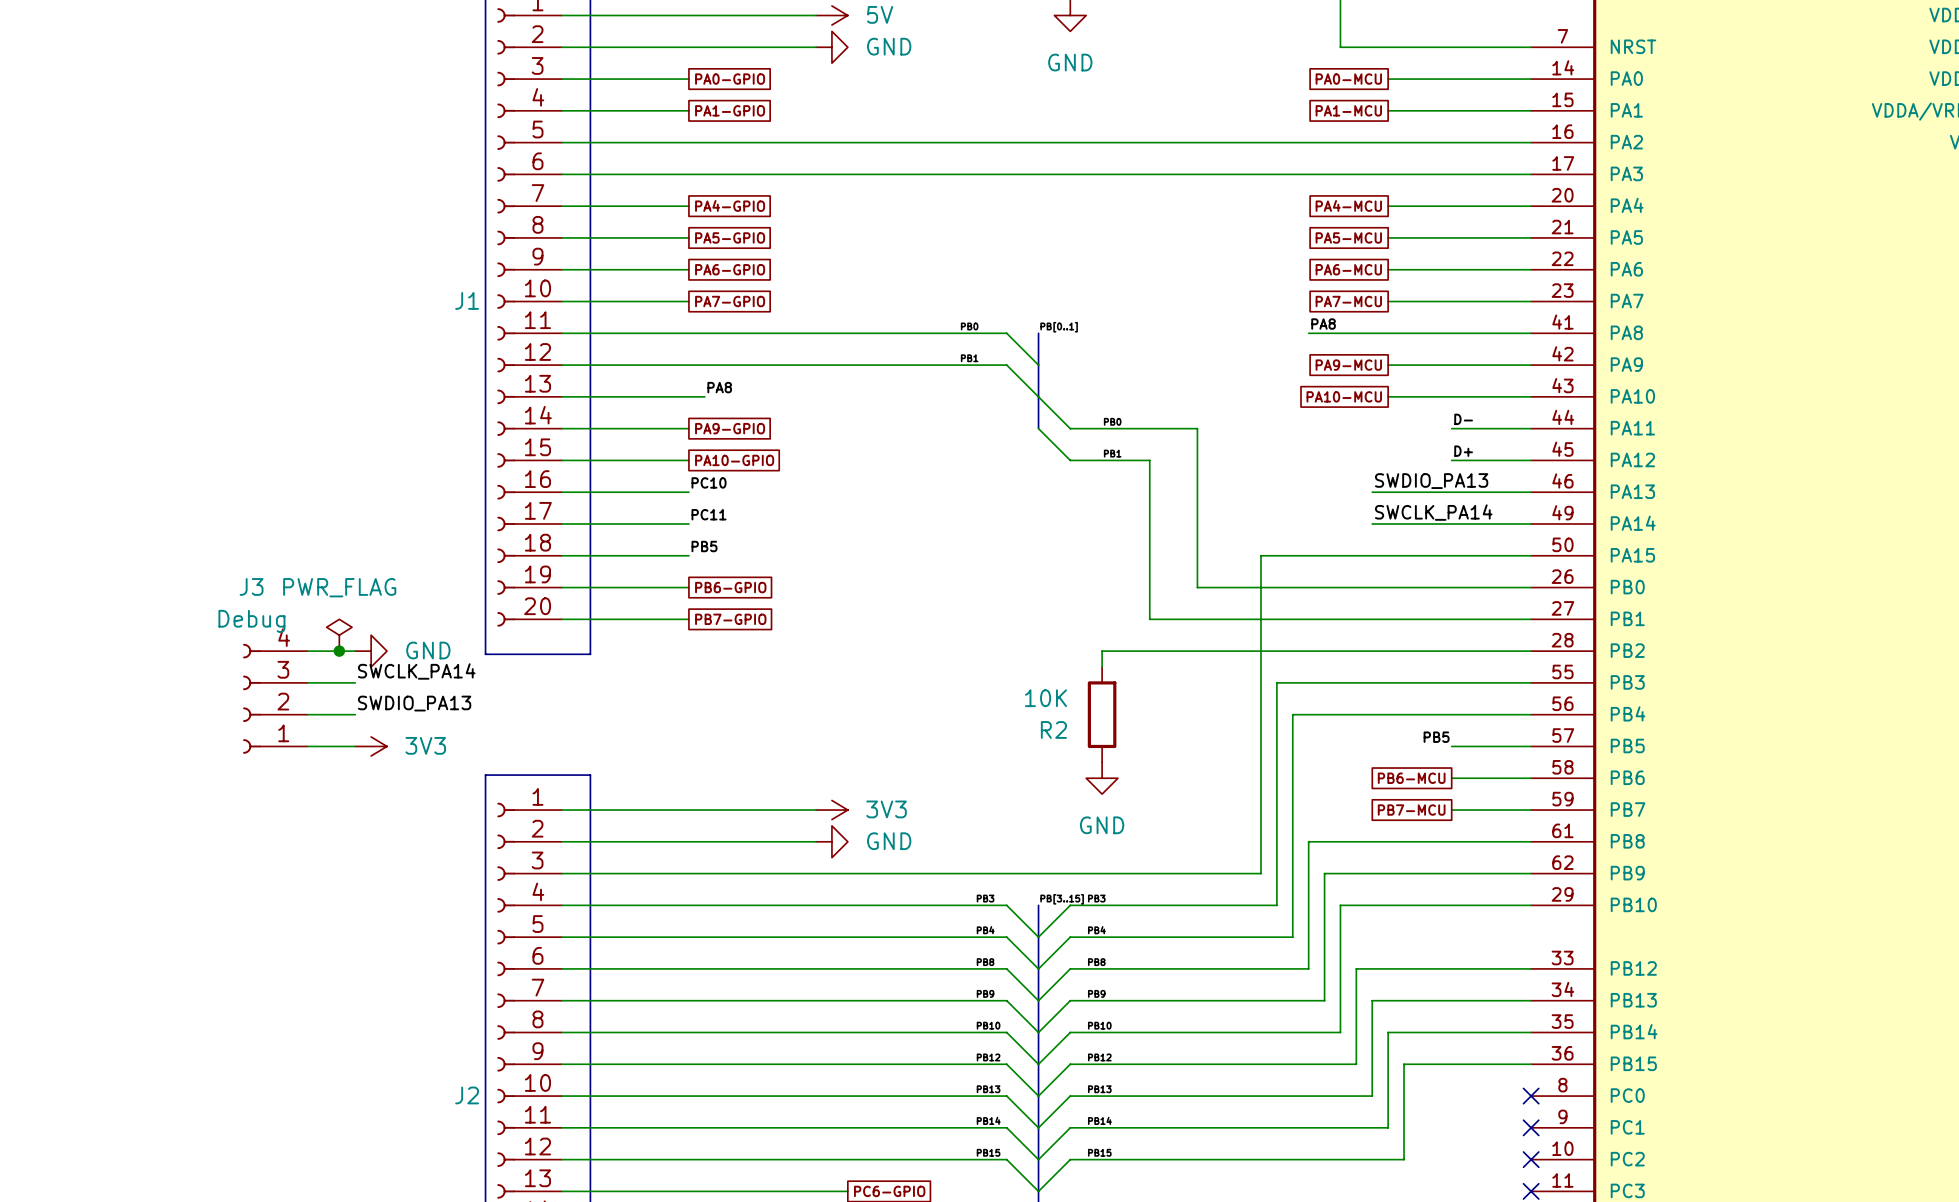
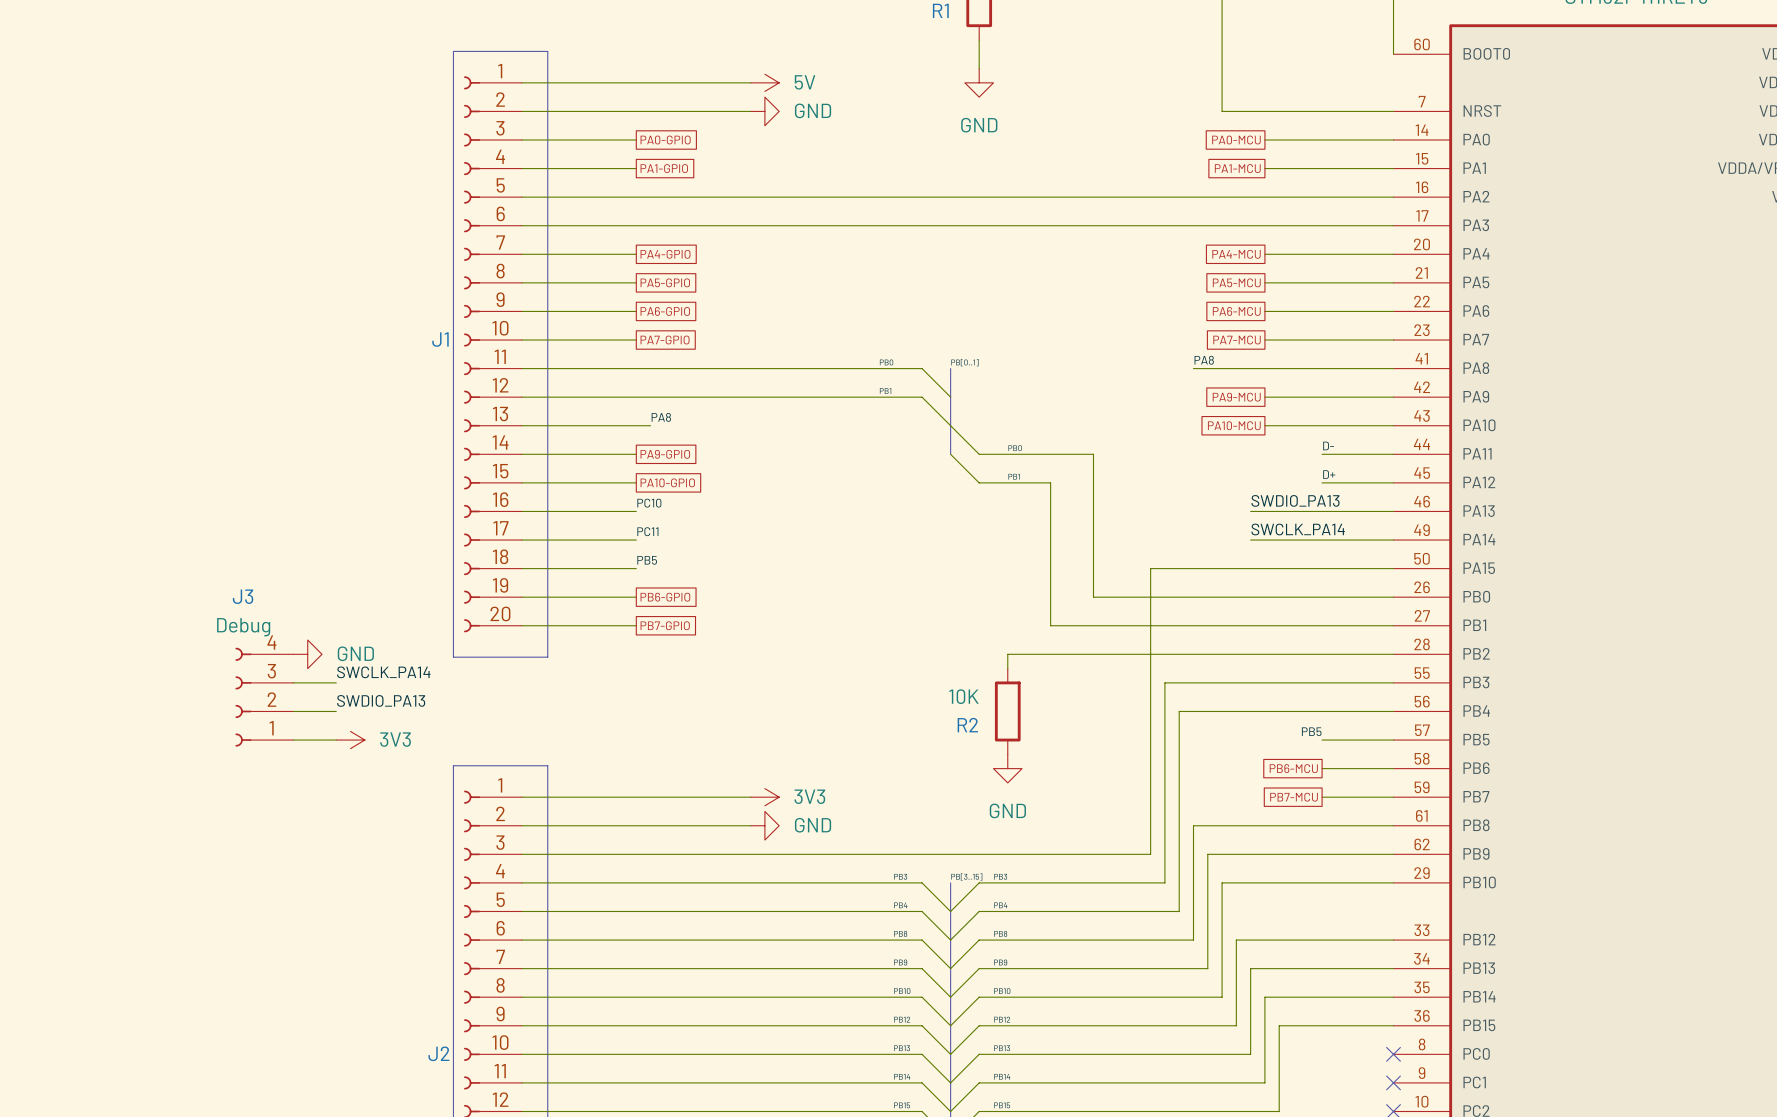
power symbol: PWR_FLAG (339, 635) -> none
wire: (307, 651) (355, 651) -> none
junction: (339, 651) -> none
power symbol position: GND (371, 651) -> GND (307, 654)

